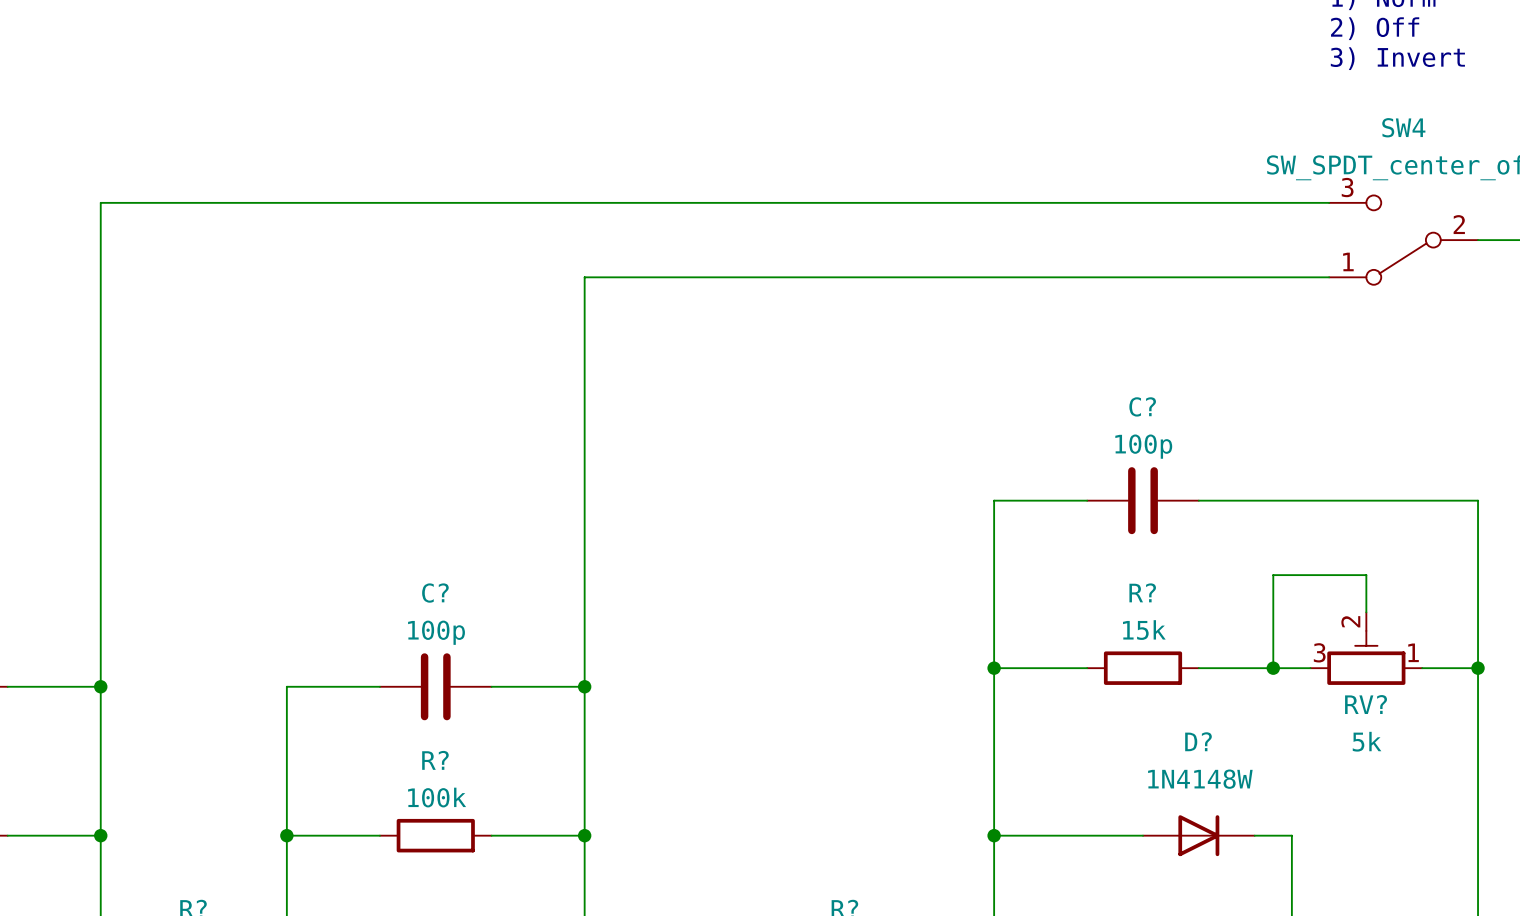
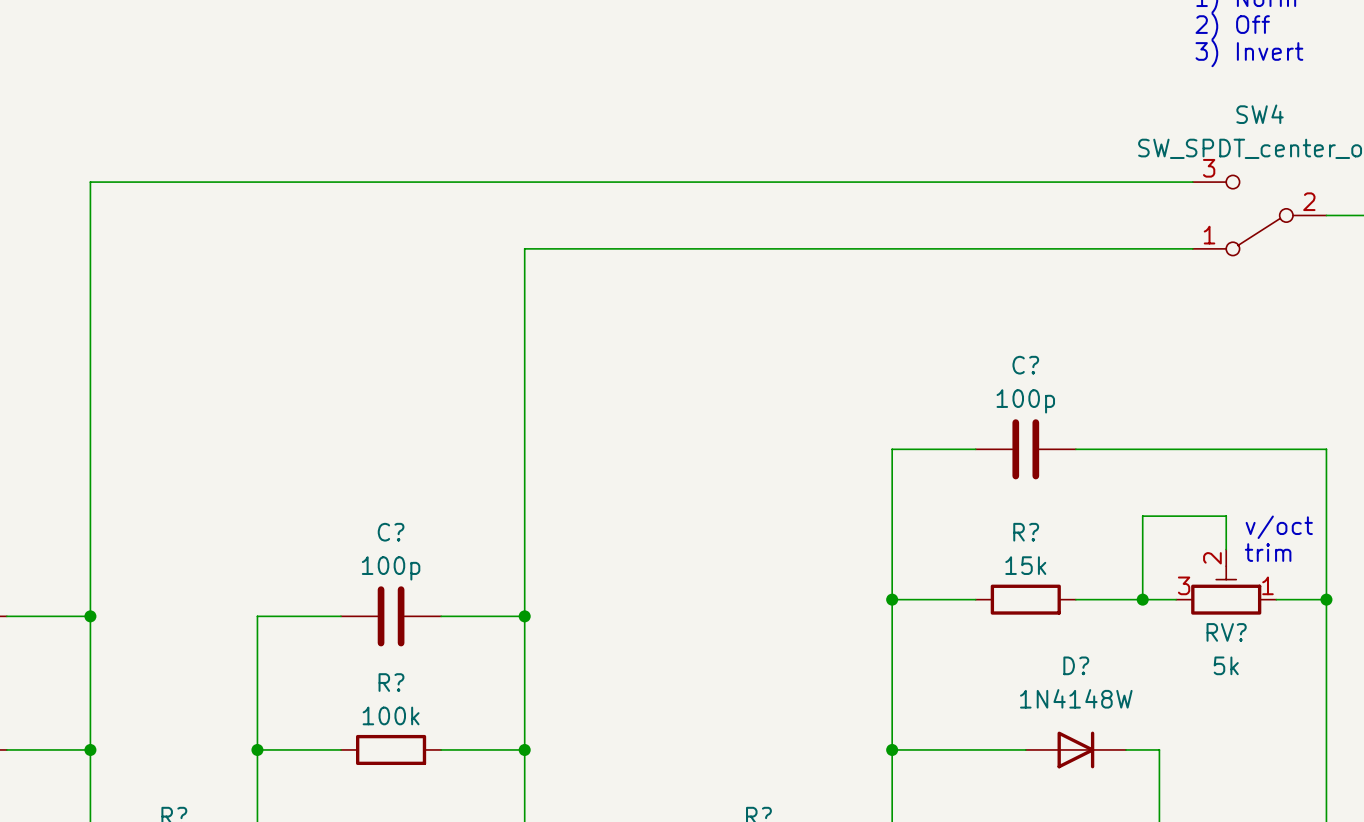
text: none -> v/oct (1279, 527)
text: none -> trim (1268, 552)

